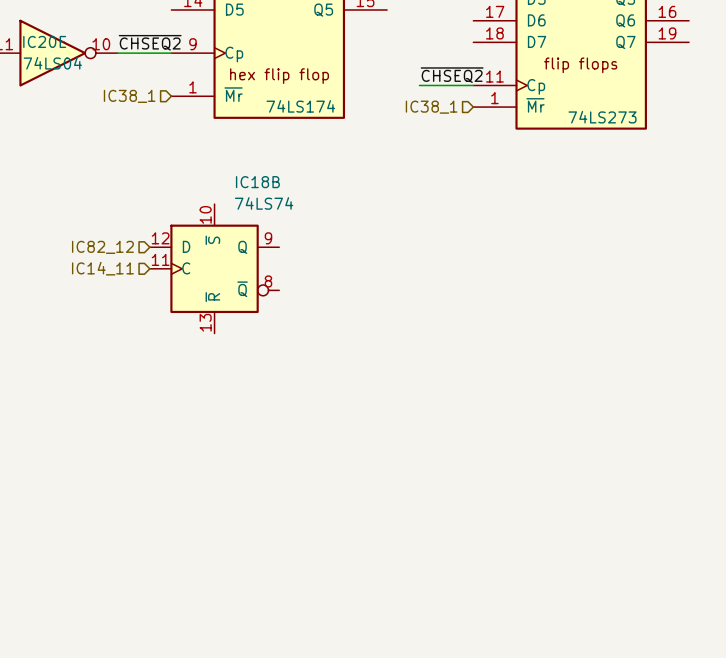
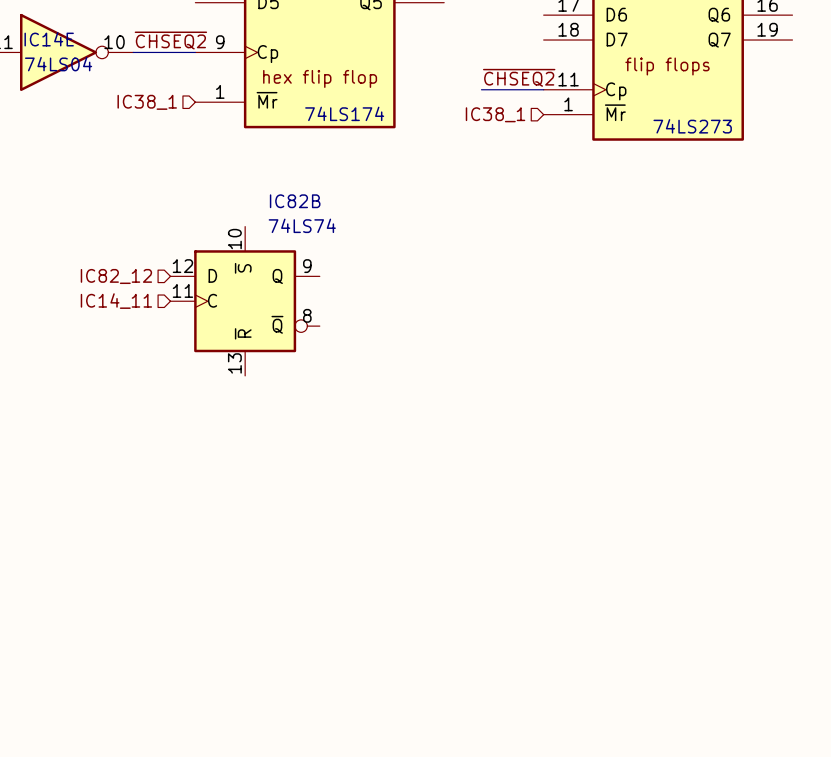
IC20E name: IC20E (44, 41) -> IC14E (49, 39)
IC18B name: IC18B (257, 182) -> IC82B (295, 201)

